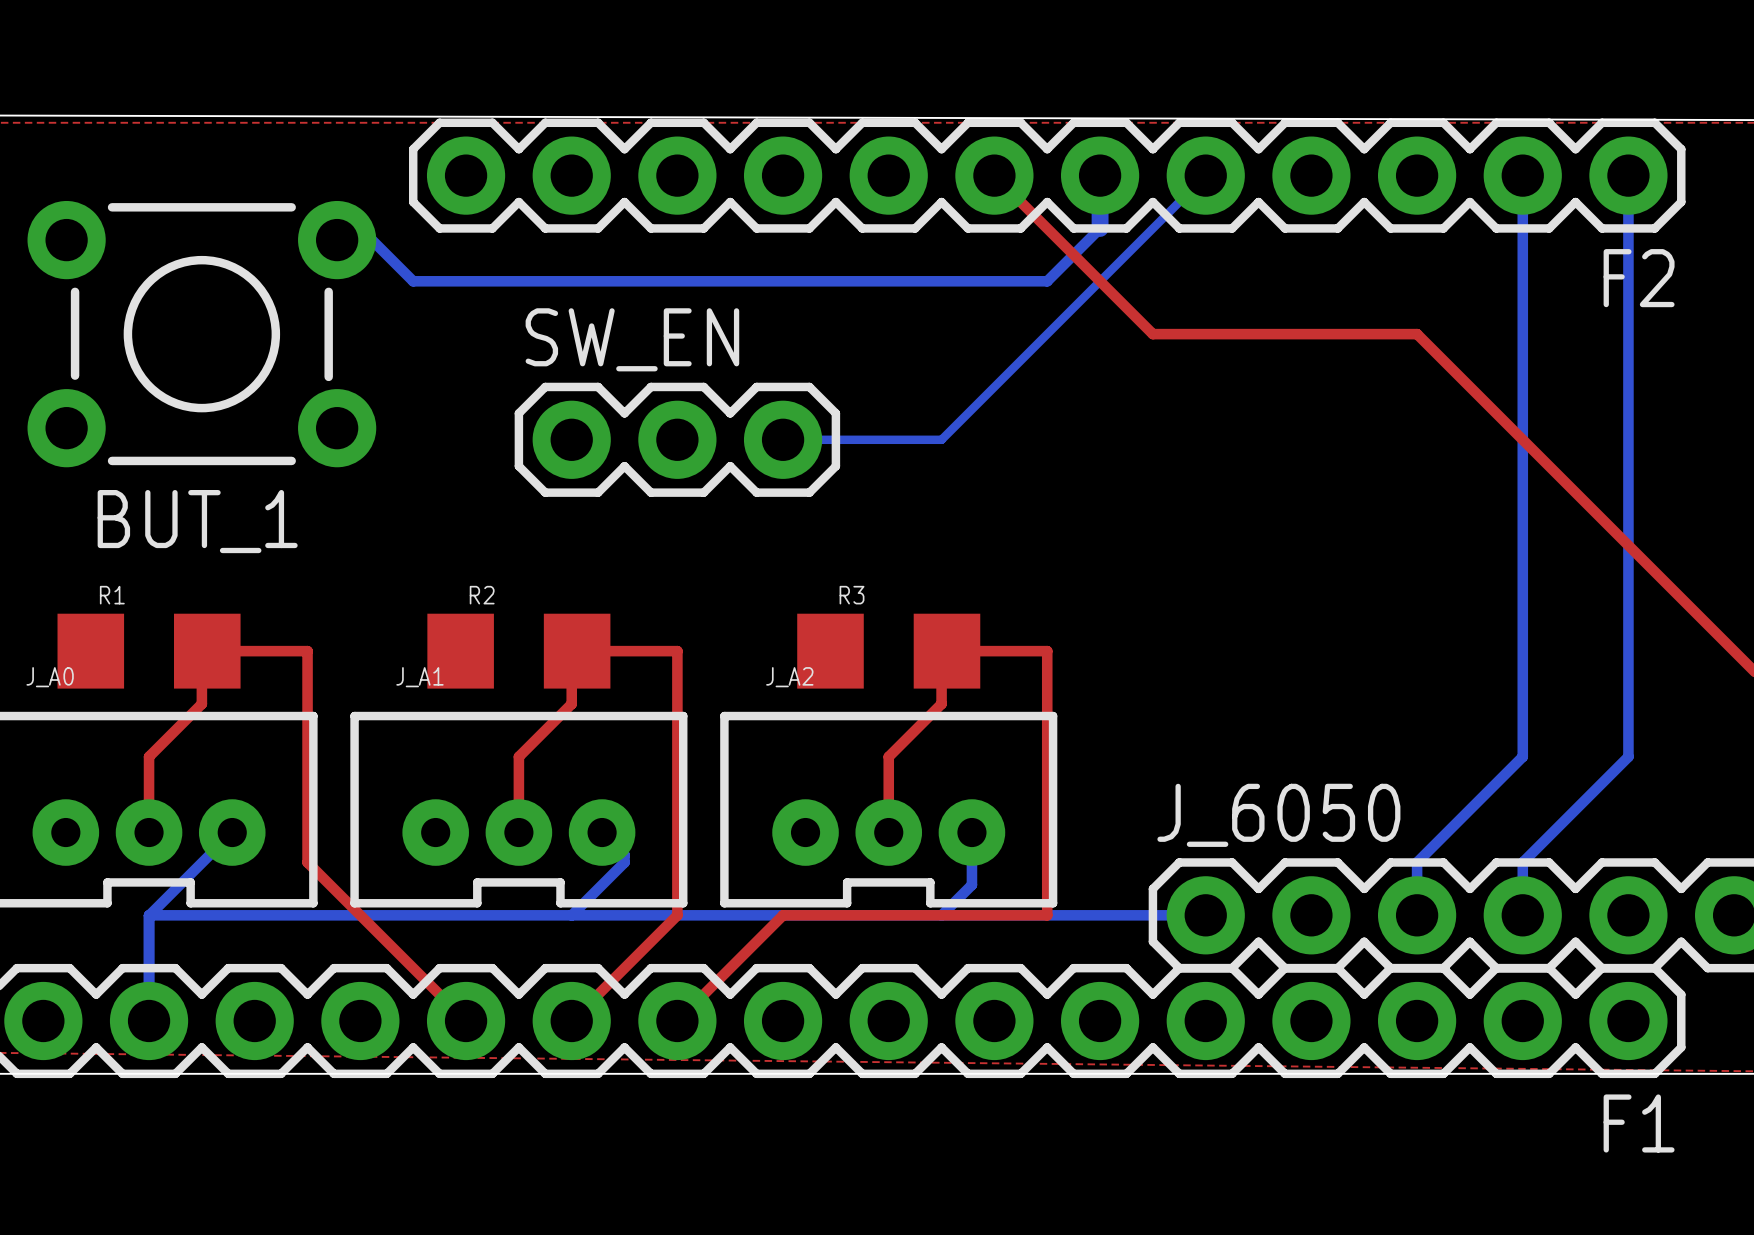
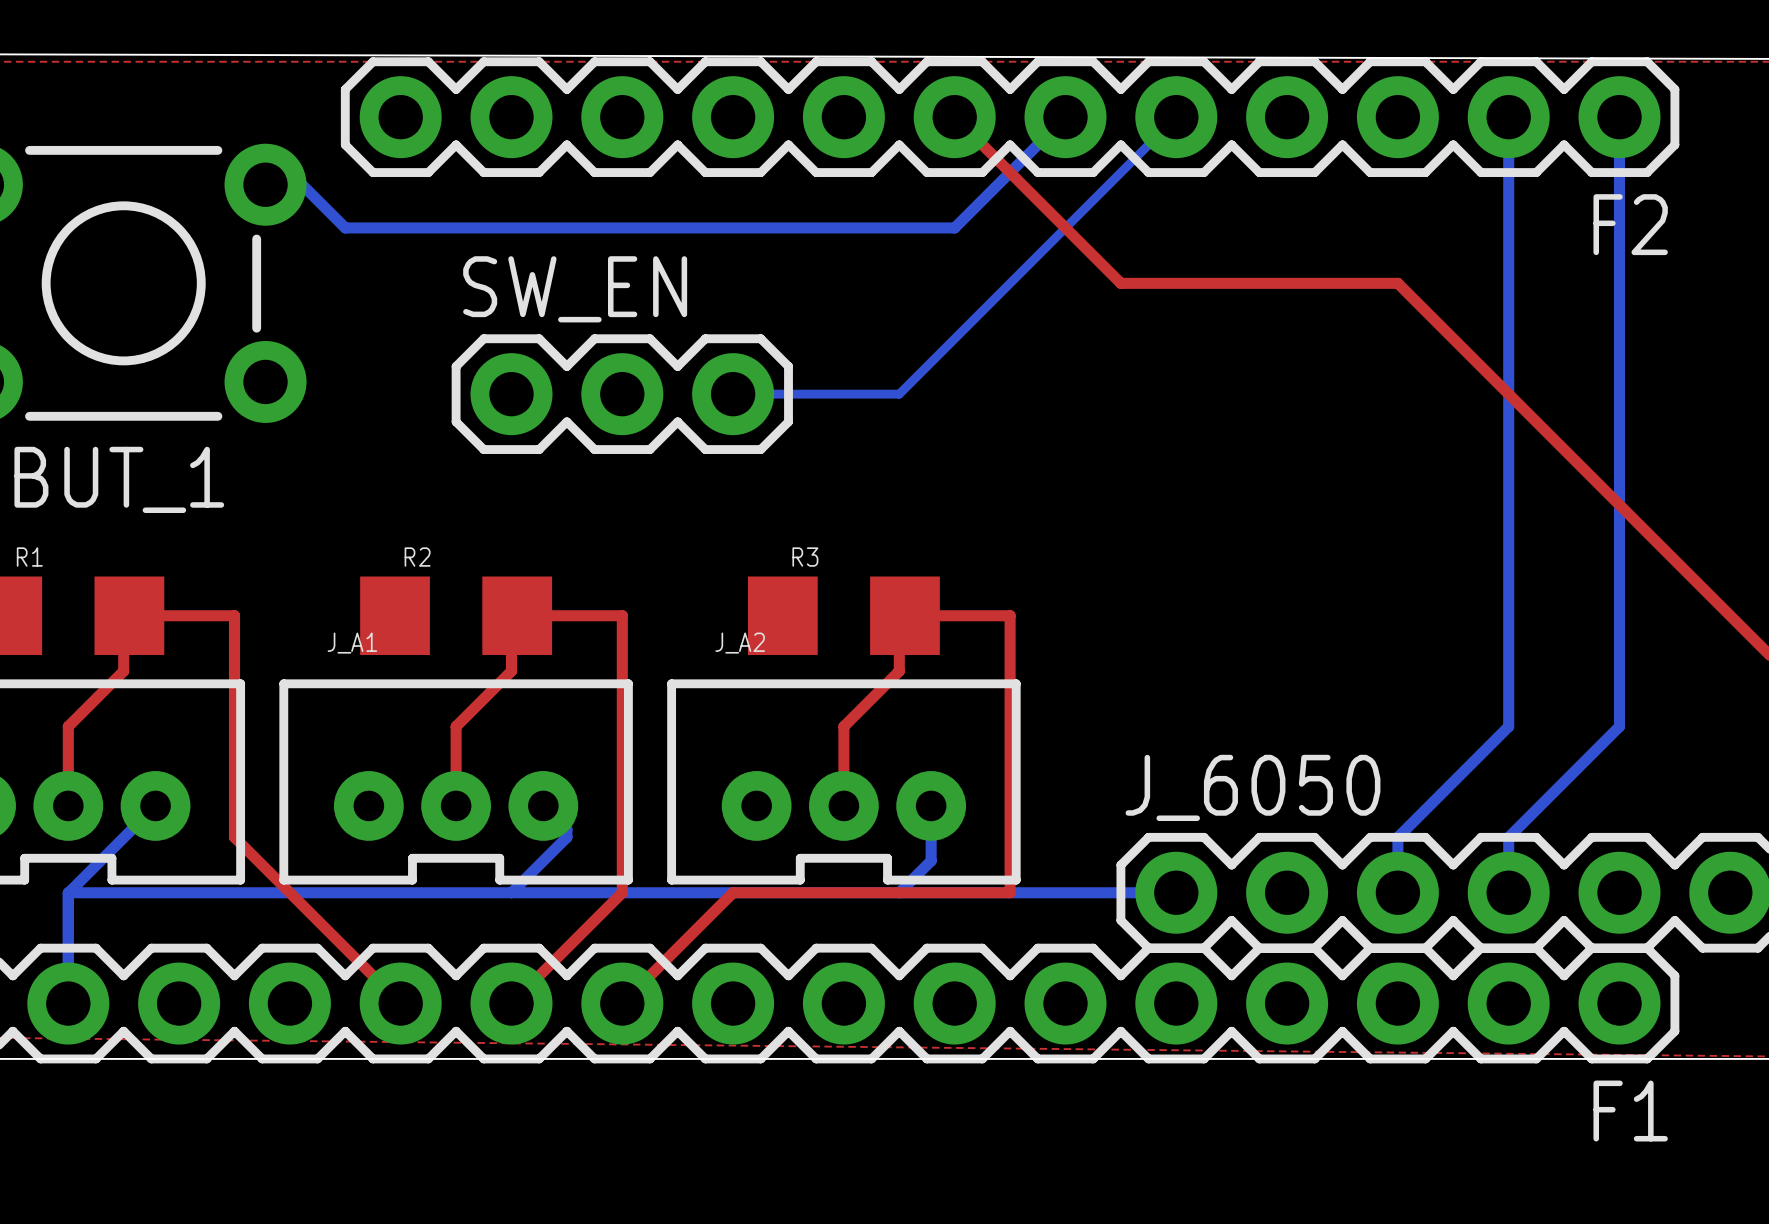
bottom track: (1100, 175) (1100, 228) (1047, 281) (994, 281) -> (1065, 117) (954, 227)

